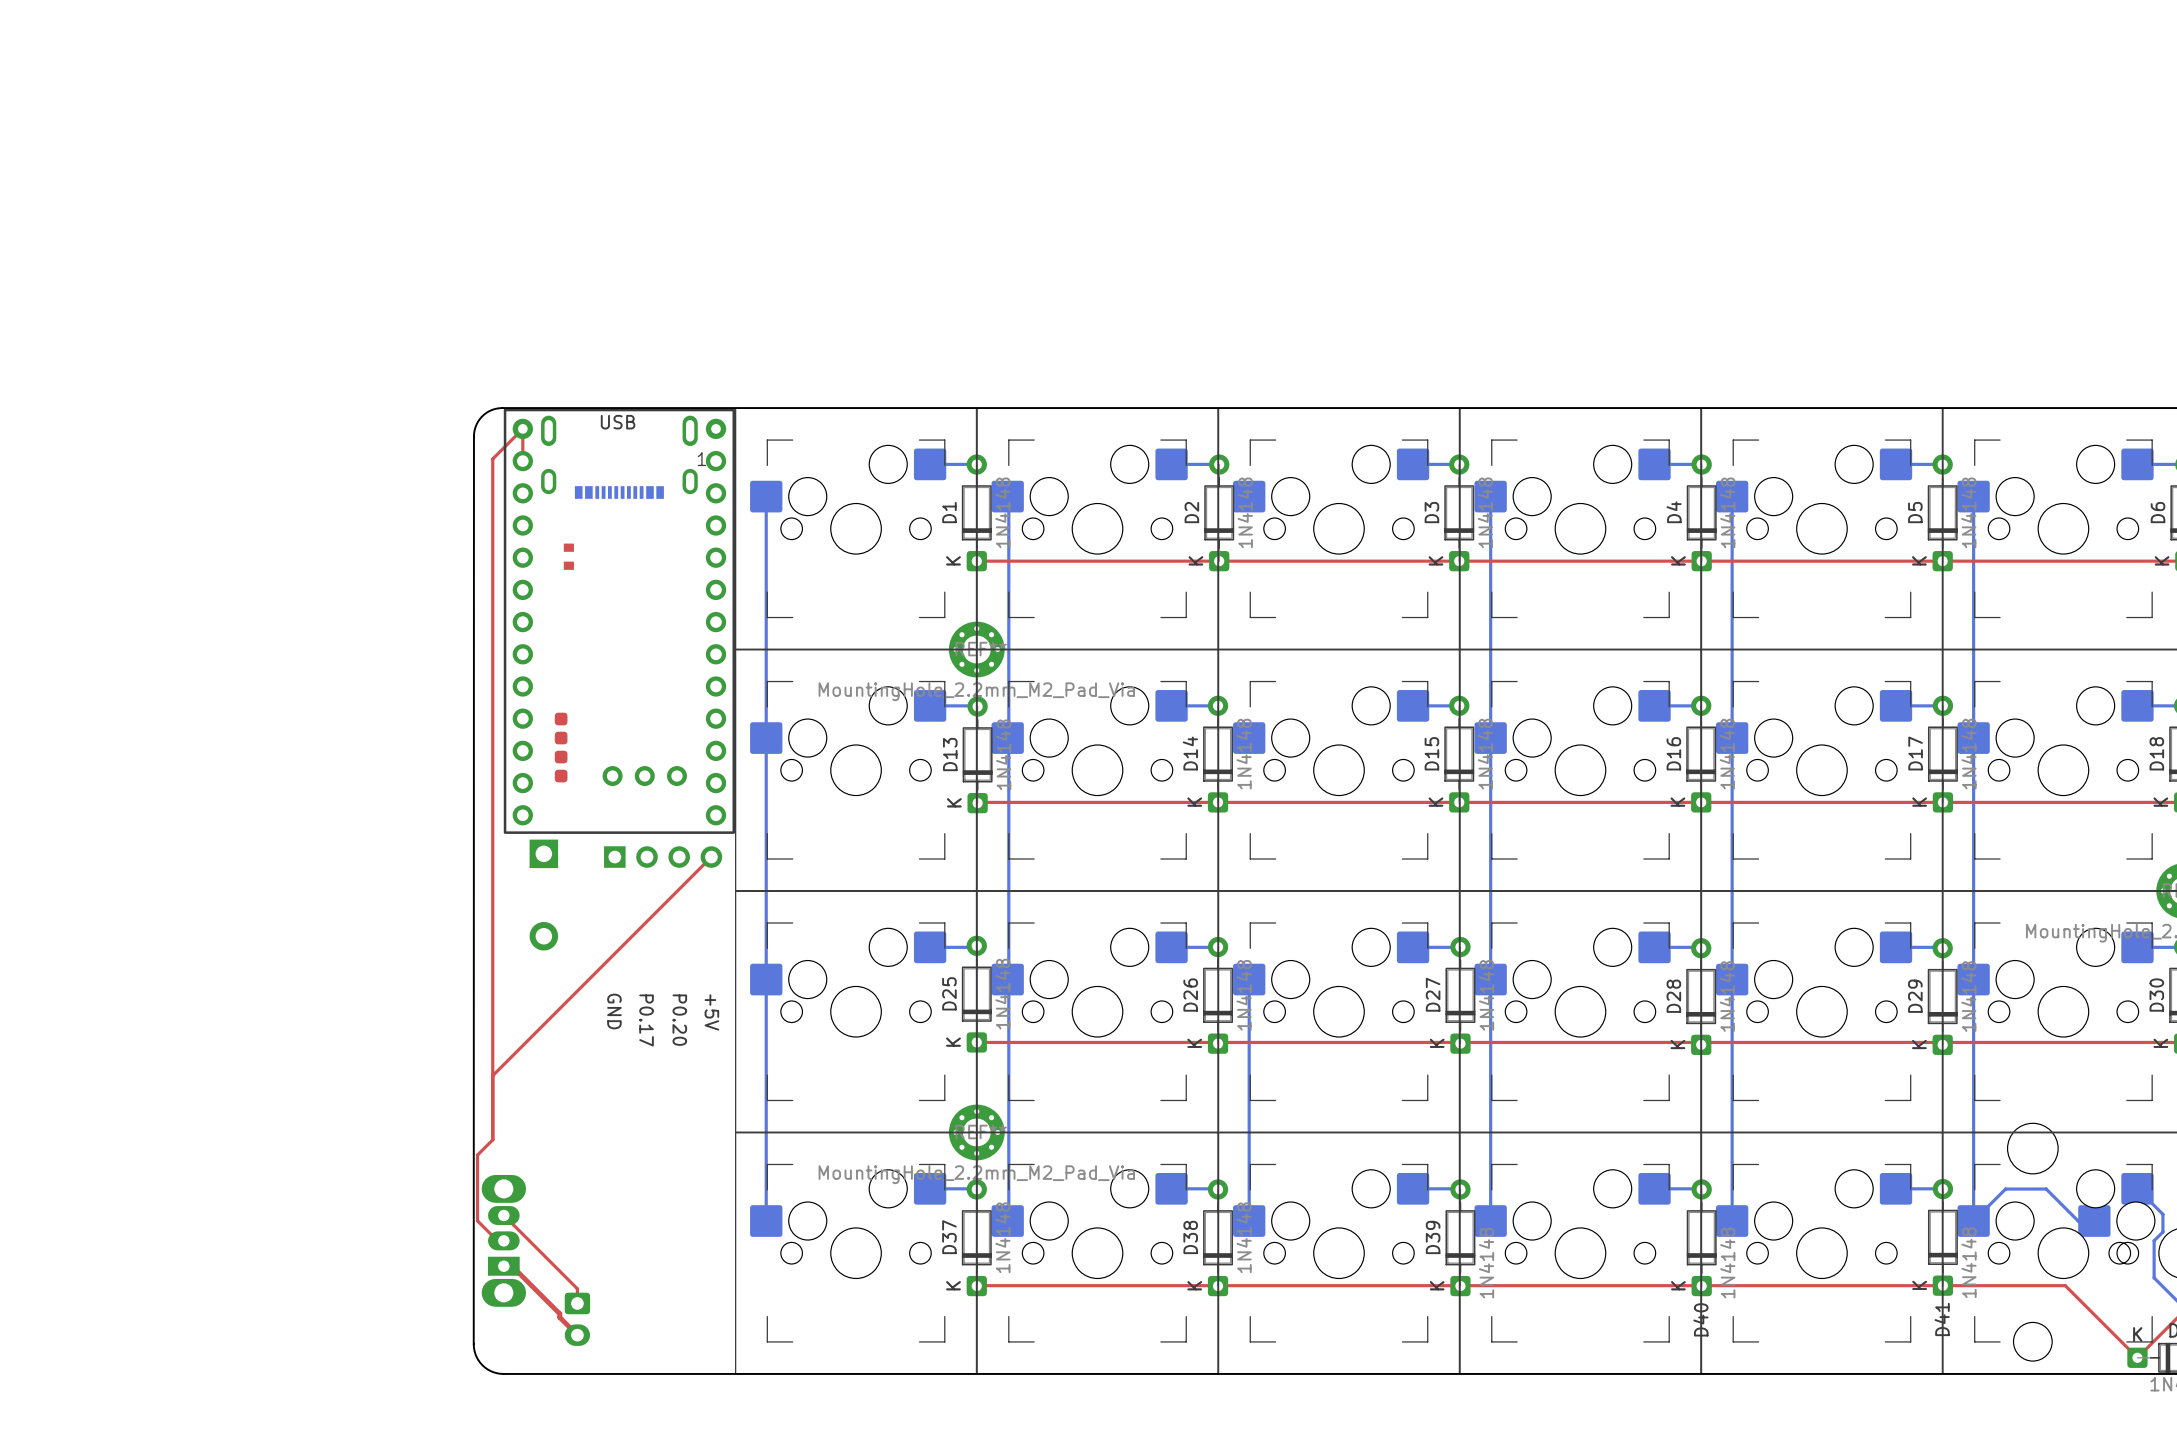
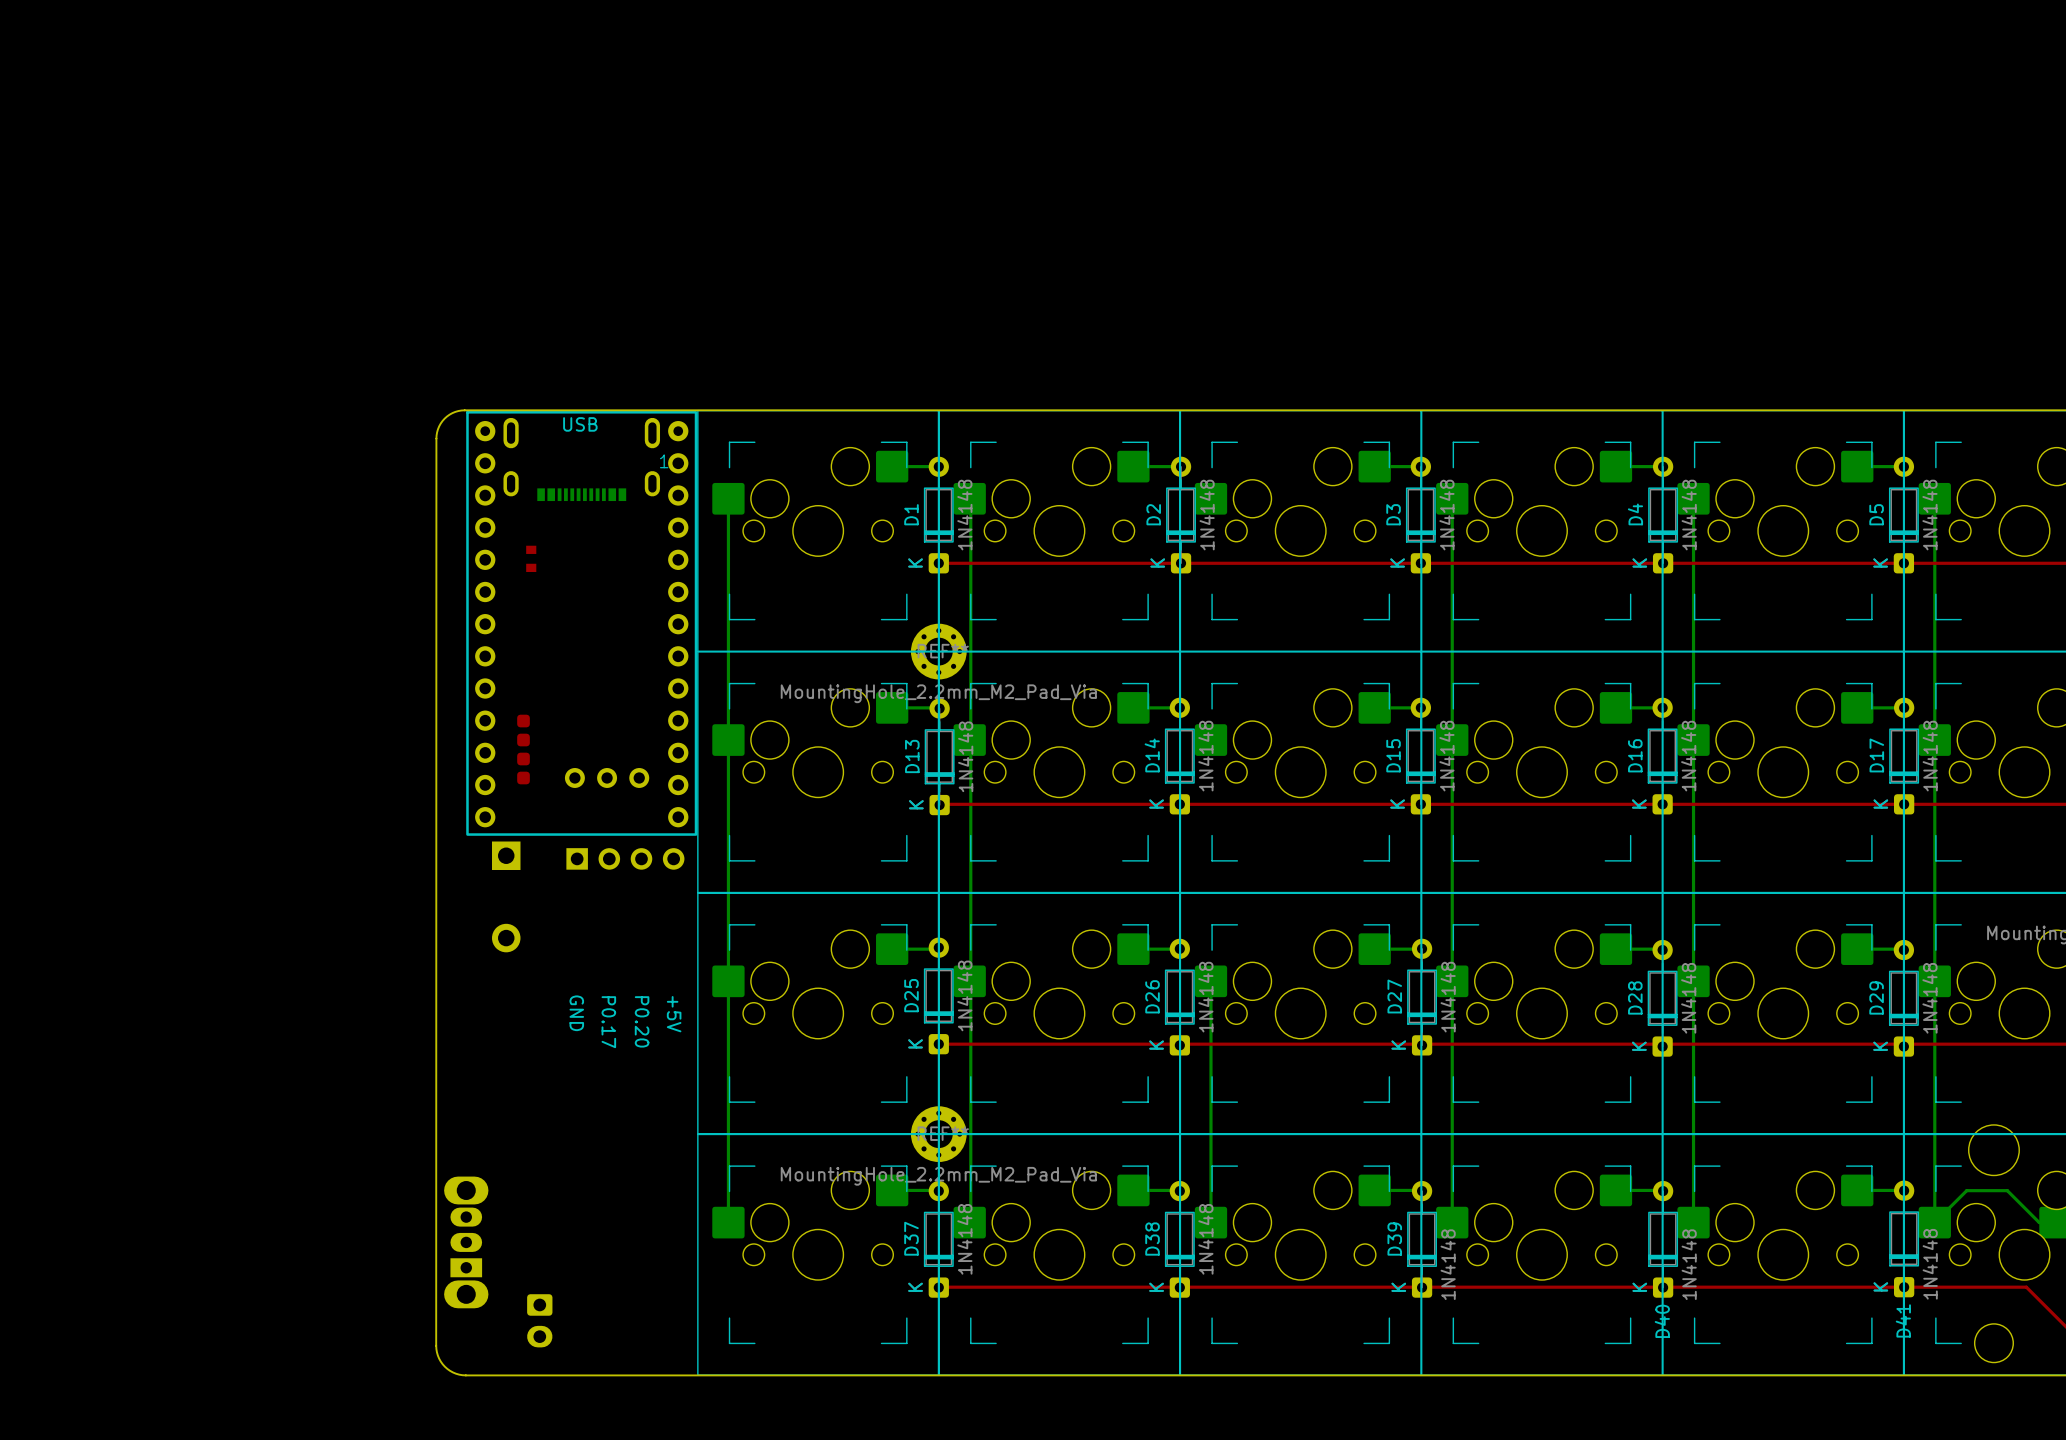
top track: (522, 461) (522, 428) (492, 458) (492, 1139) (477, 1155) (477, 1220) (497, 1240) (503, 1240) -> none
top track: (711, 857) (492, 1075) -> none
top track: (503, 1215) (577, 1288) (577, 1303) -> none
top track: (503, 1266) (512, 1266) (559, 1313) (559, 1317) (577, 1335) -> none

